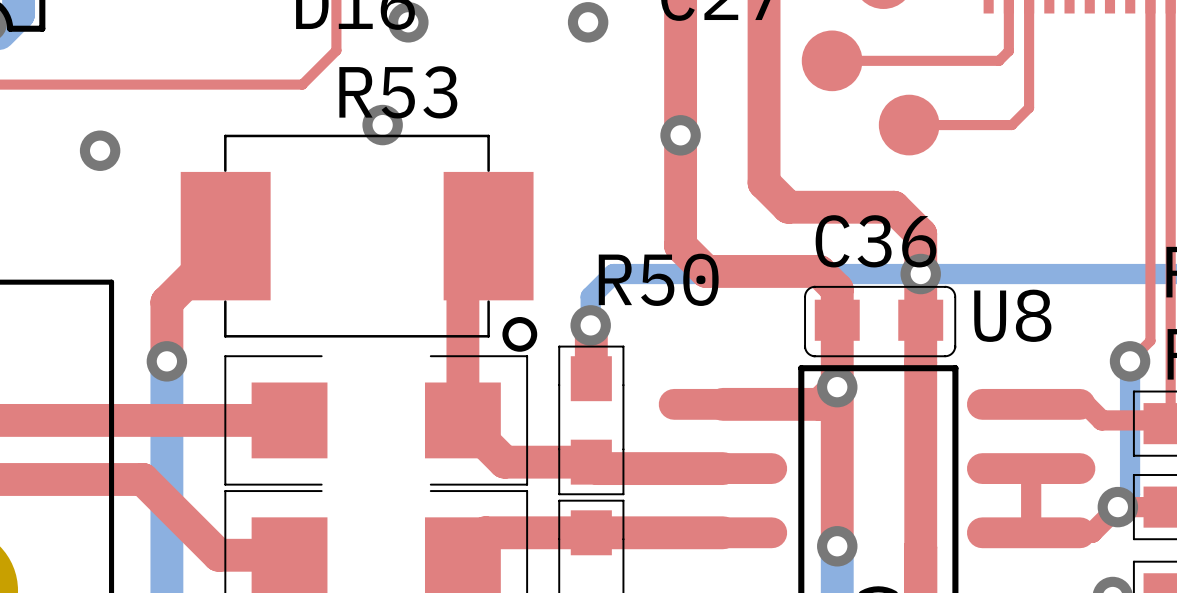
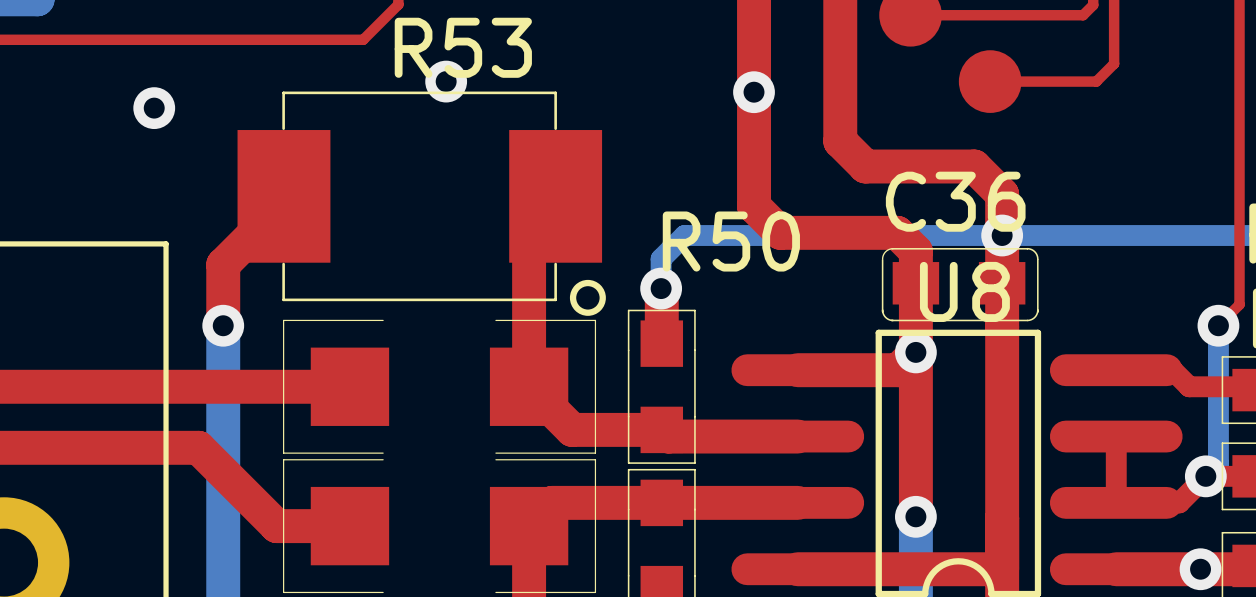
U8 name position: U8 (1012, 315) -> U8 (964, 291)

